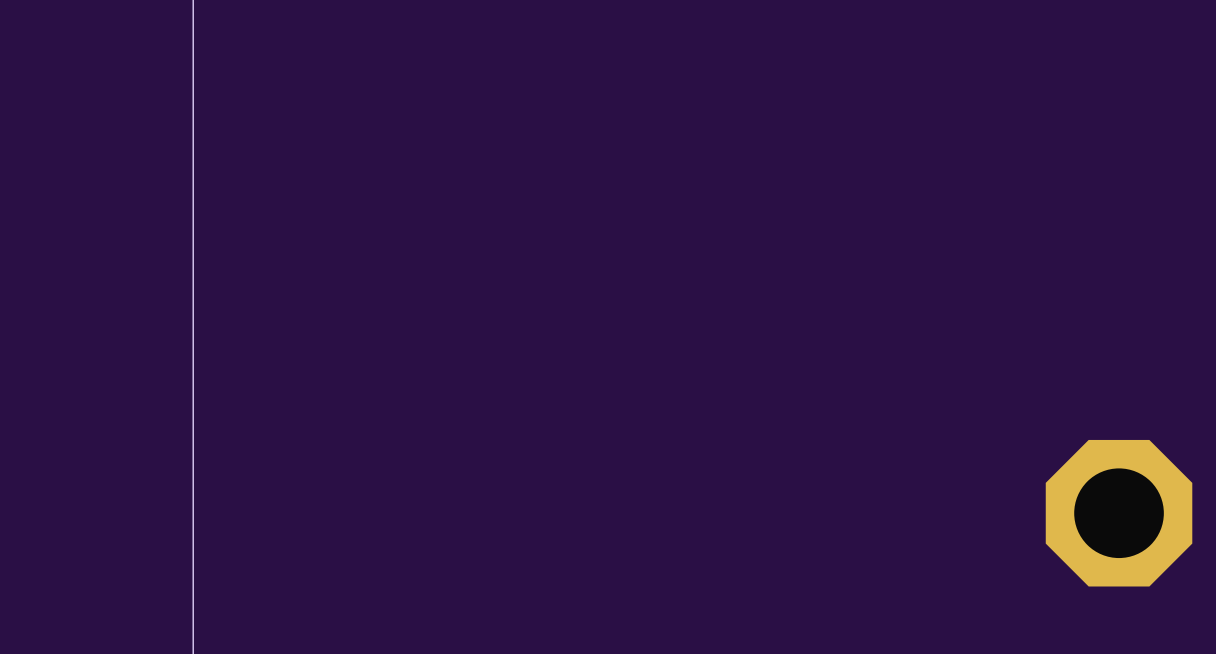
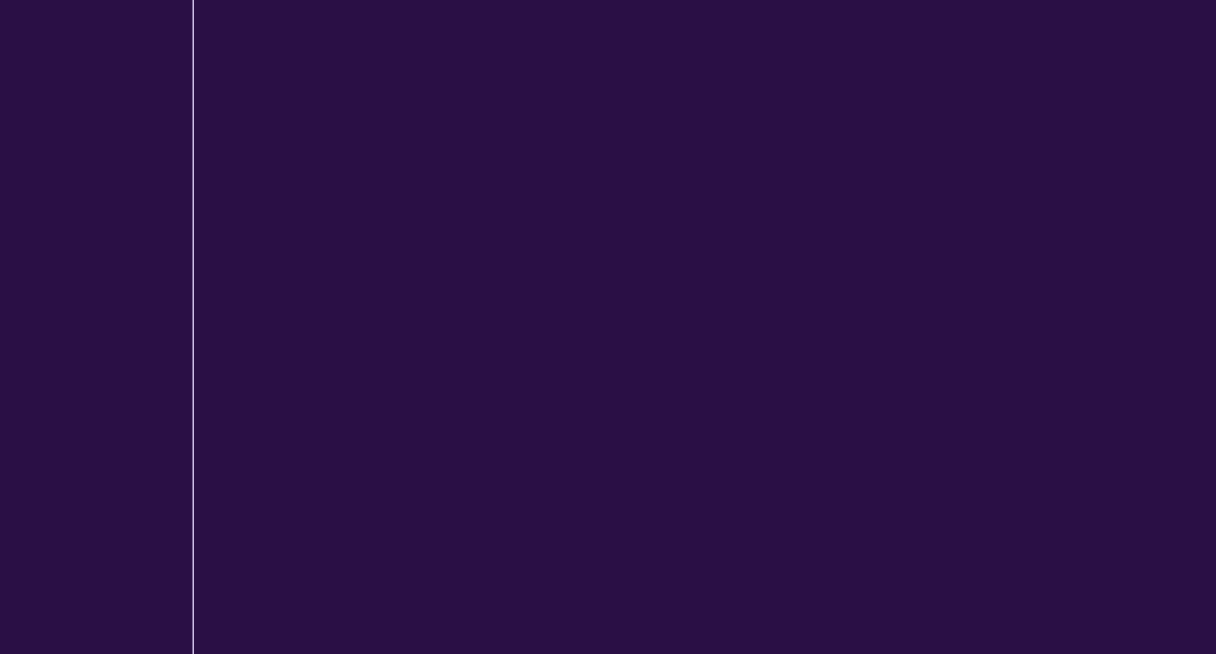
part: (1119, 513) -> none

